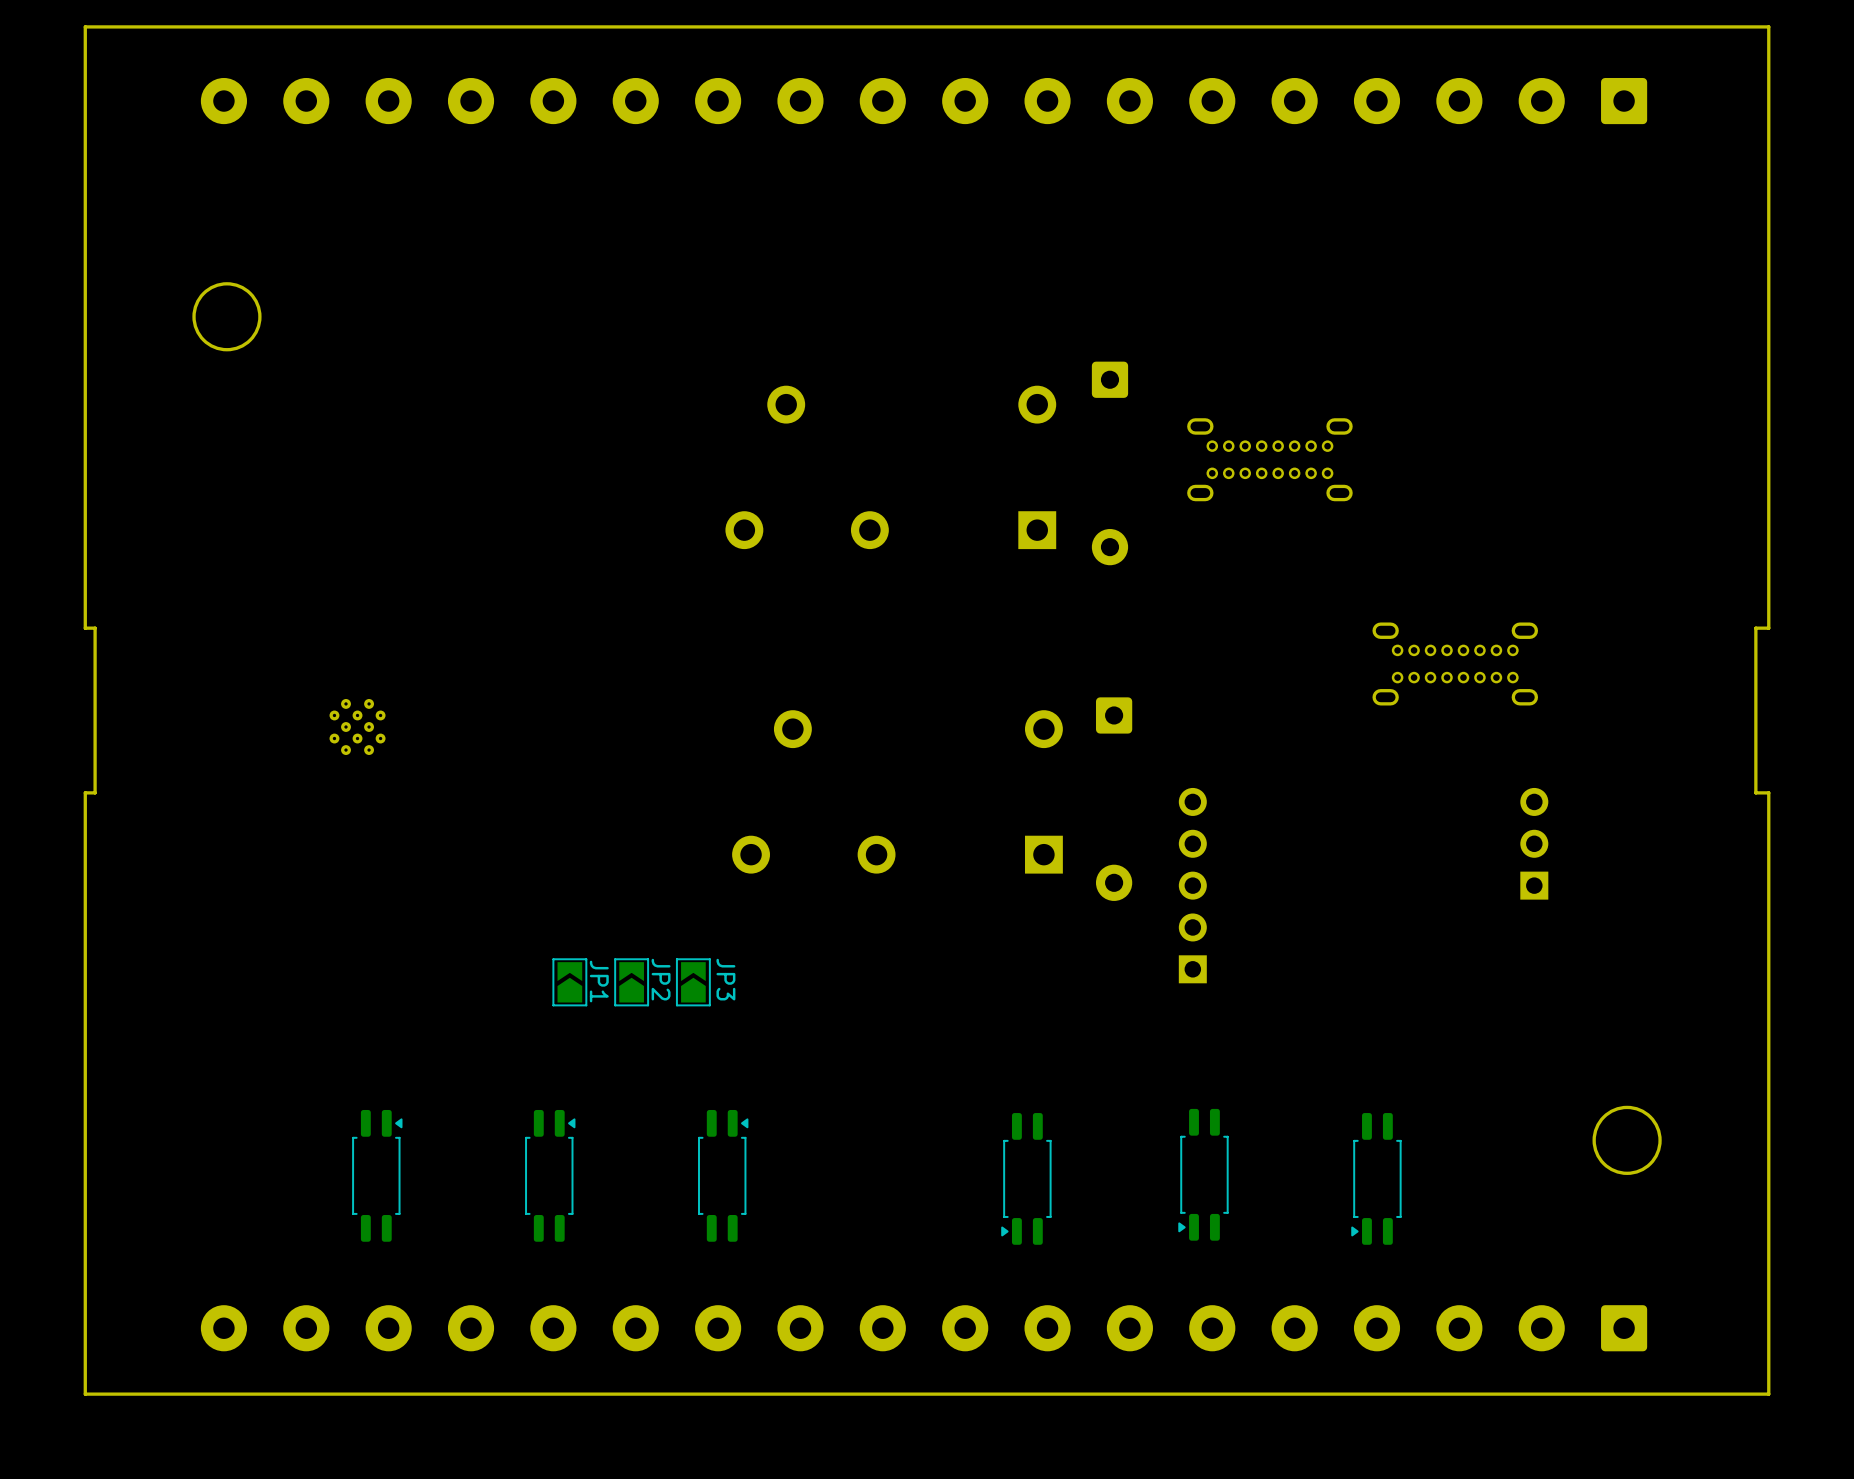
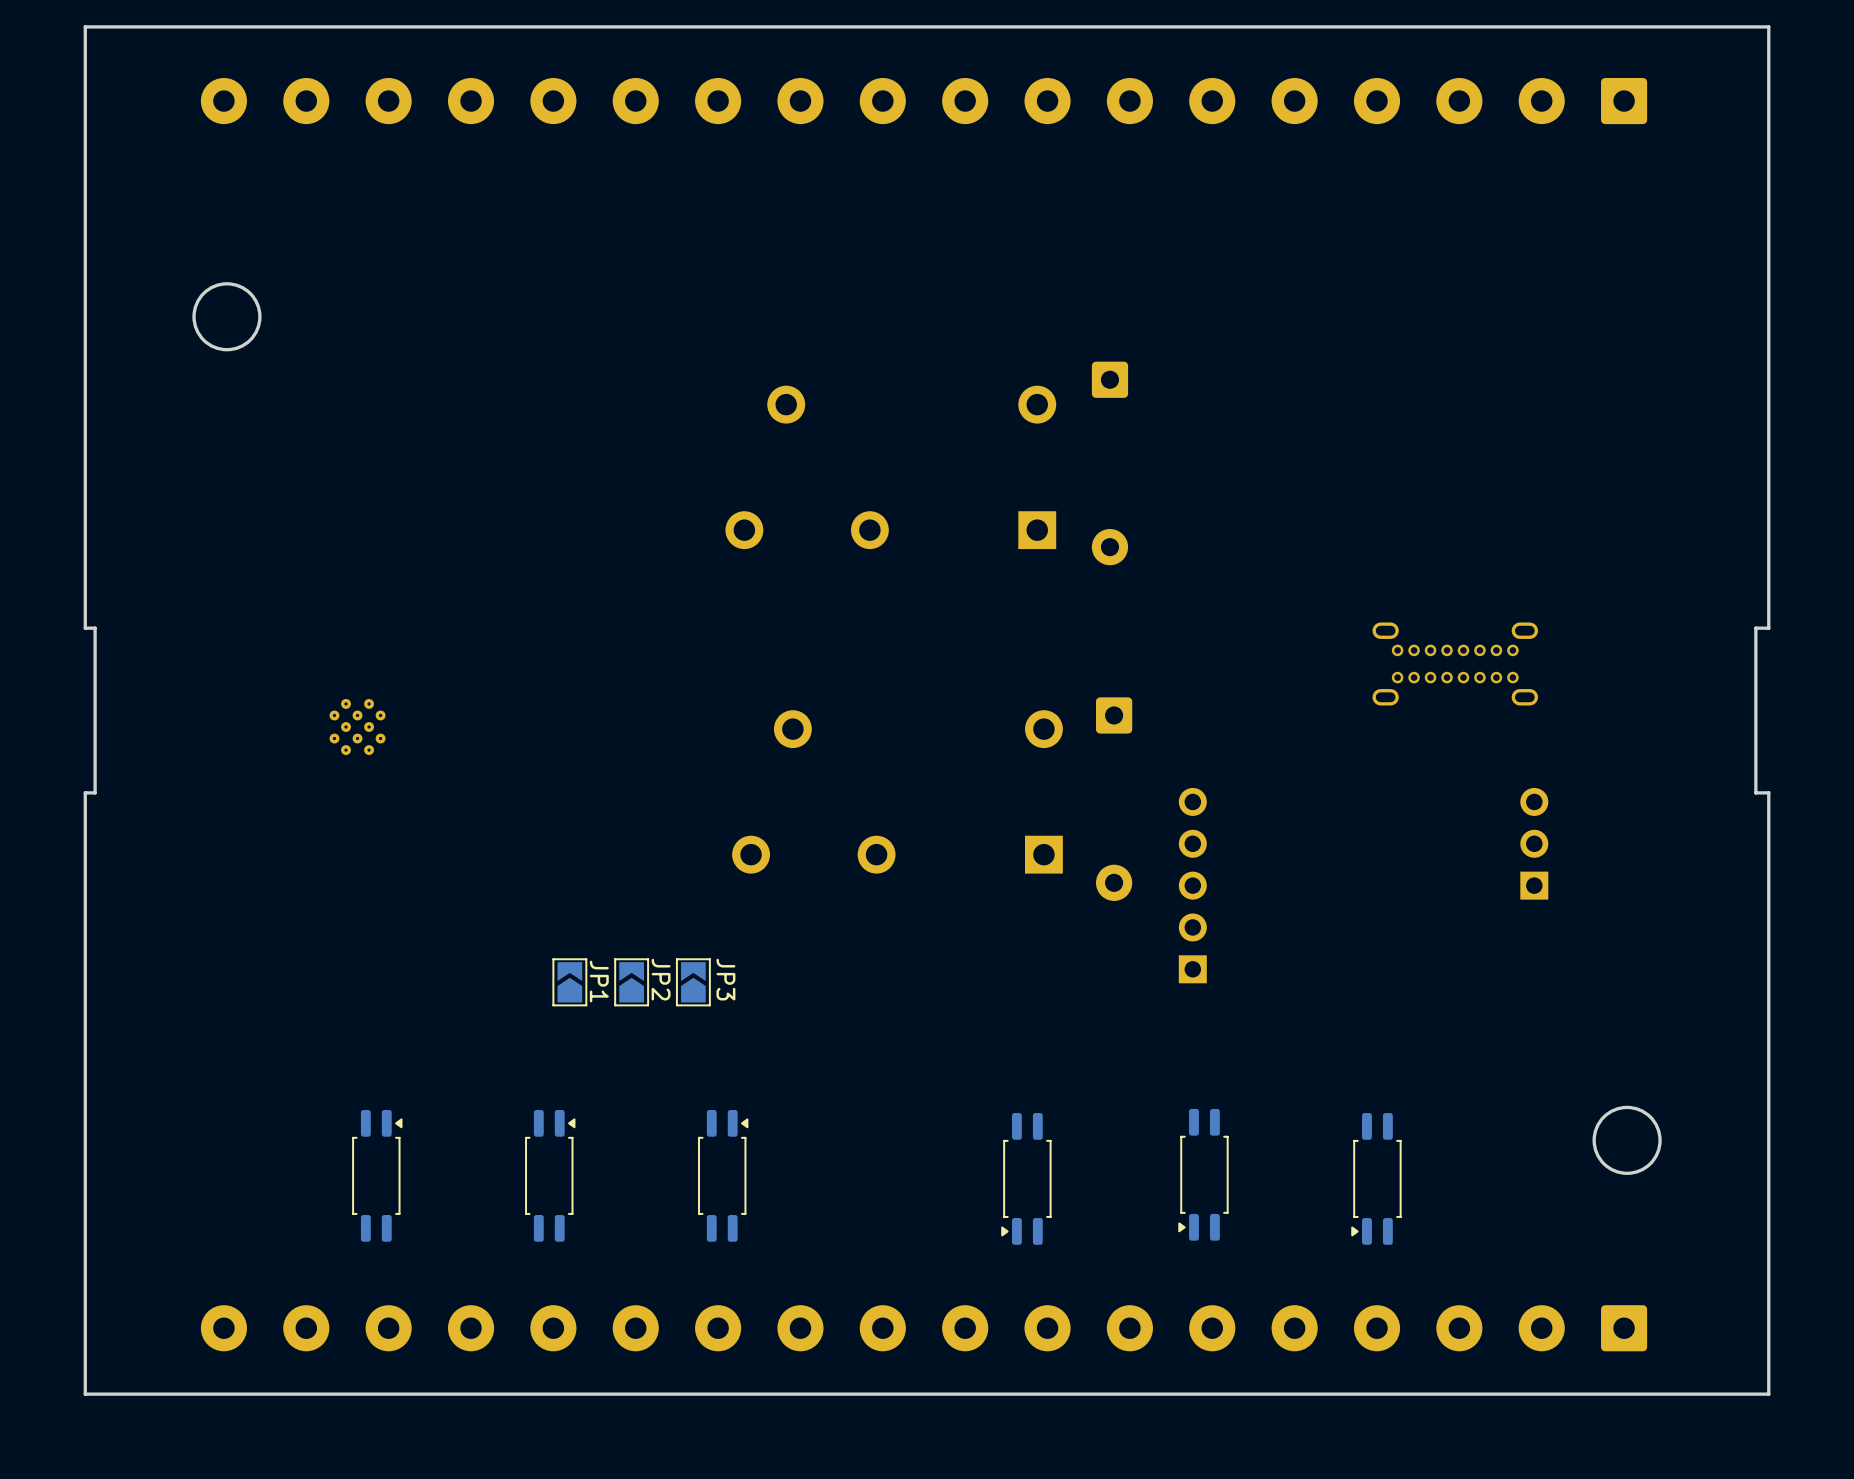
part: (1269, 459) -> none

